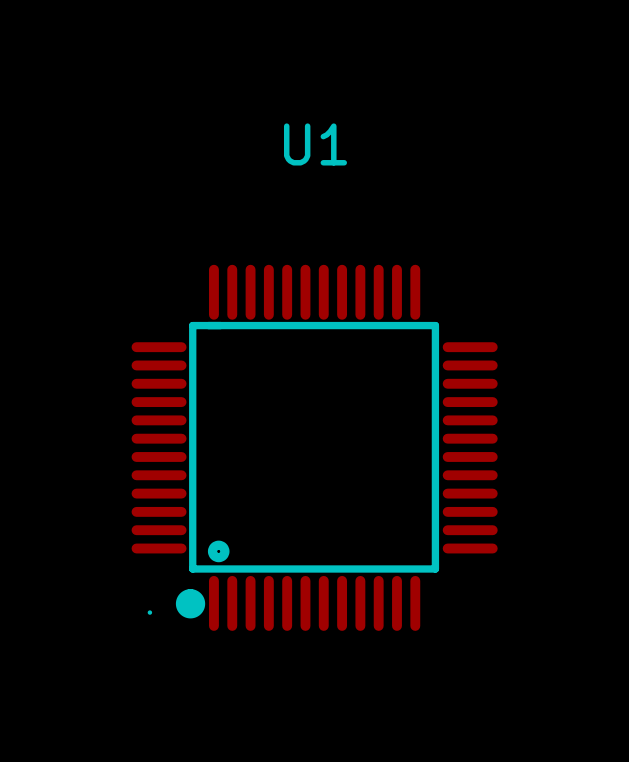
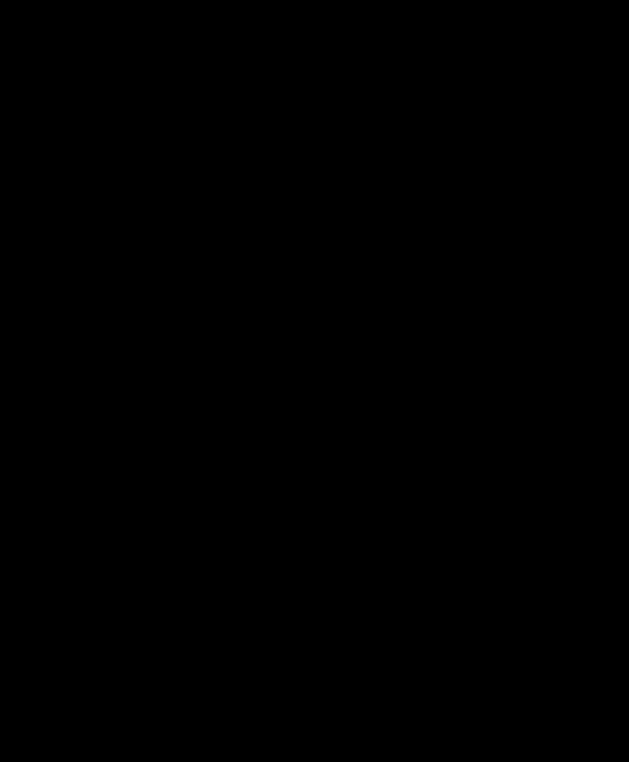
U1: (314, 447) -> none

